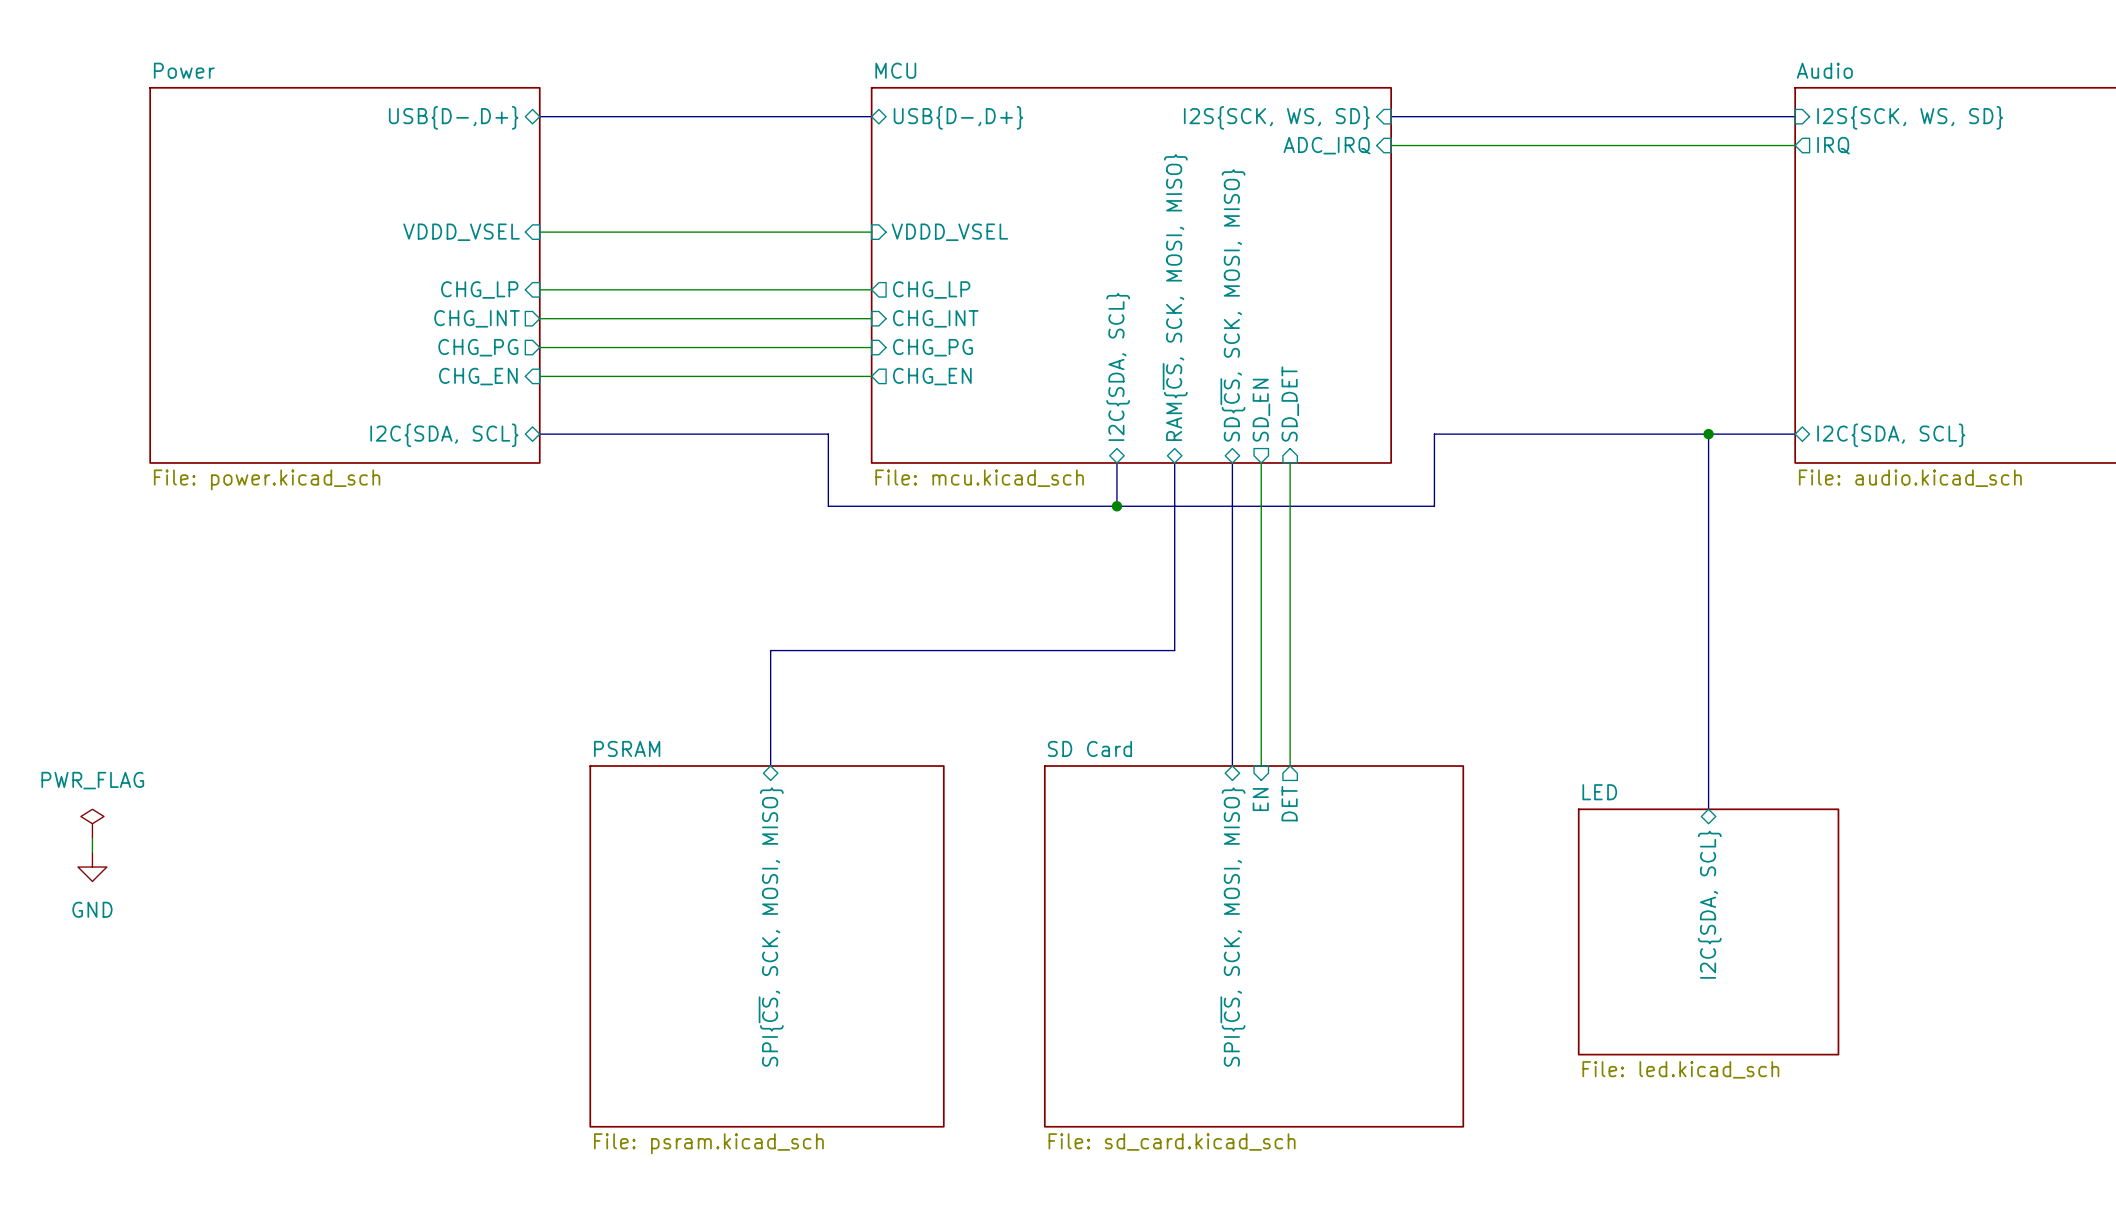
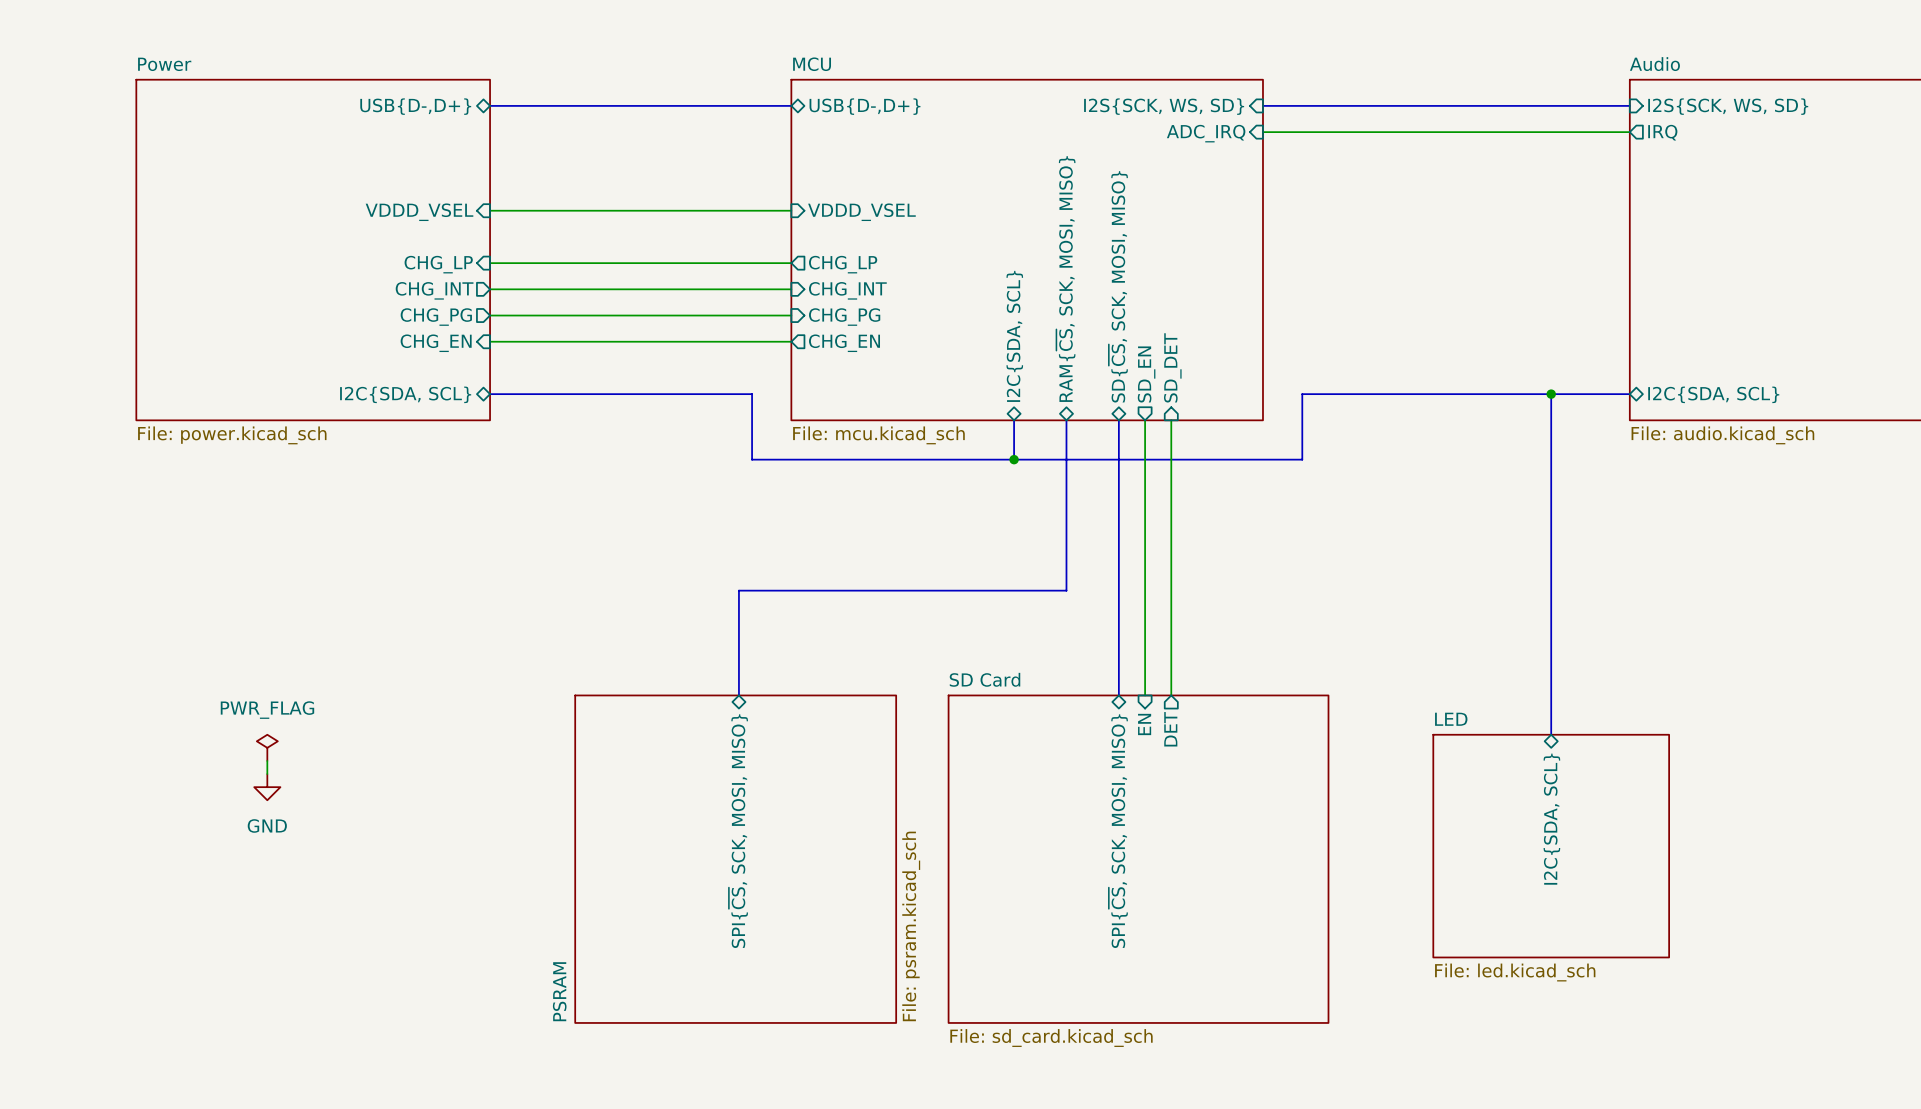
bus: (813, 650) (770, 650) (770, 766) -> (738, 590) (738, 695)
sheet PSRAM name rotation: 0° (627, 748) -> 90° counterclockwise (559, 991)
sheet PSRAM name position: PSRAM (627, 748) -> PSRAM (559, 991)
power symbol position: PWR_FLAG (92, 823) -> PWR_FLAG (267, 747)
wire: (92, 838) (92, 852) -> (267, 760) (267, 774)
power symbol position: GND (92, 867) -> GND (267, 787)
sheet pin position: SPI{~{CS}, SCK, MOSI, MISO} (771, 927) -> SPI{~{CS}, SCK, MOSI, MISO} (738, 831)
sheet PSRAM position: (767, 946) -> (735, 859)
sheet PSRAM value rotation: 0° (708, 1143) -> 90° counterclockwise (911, 926)

